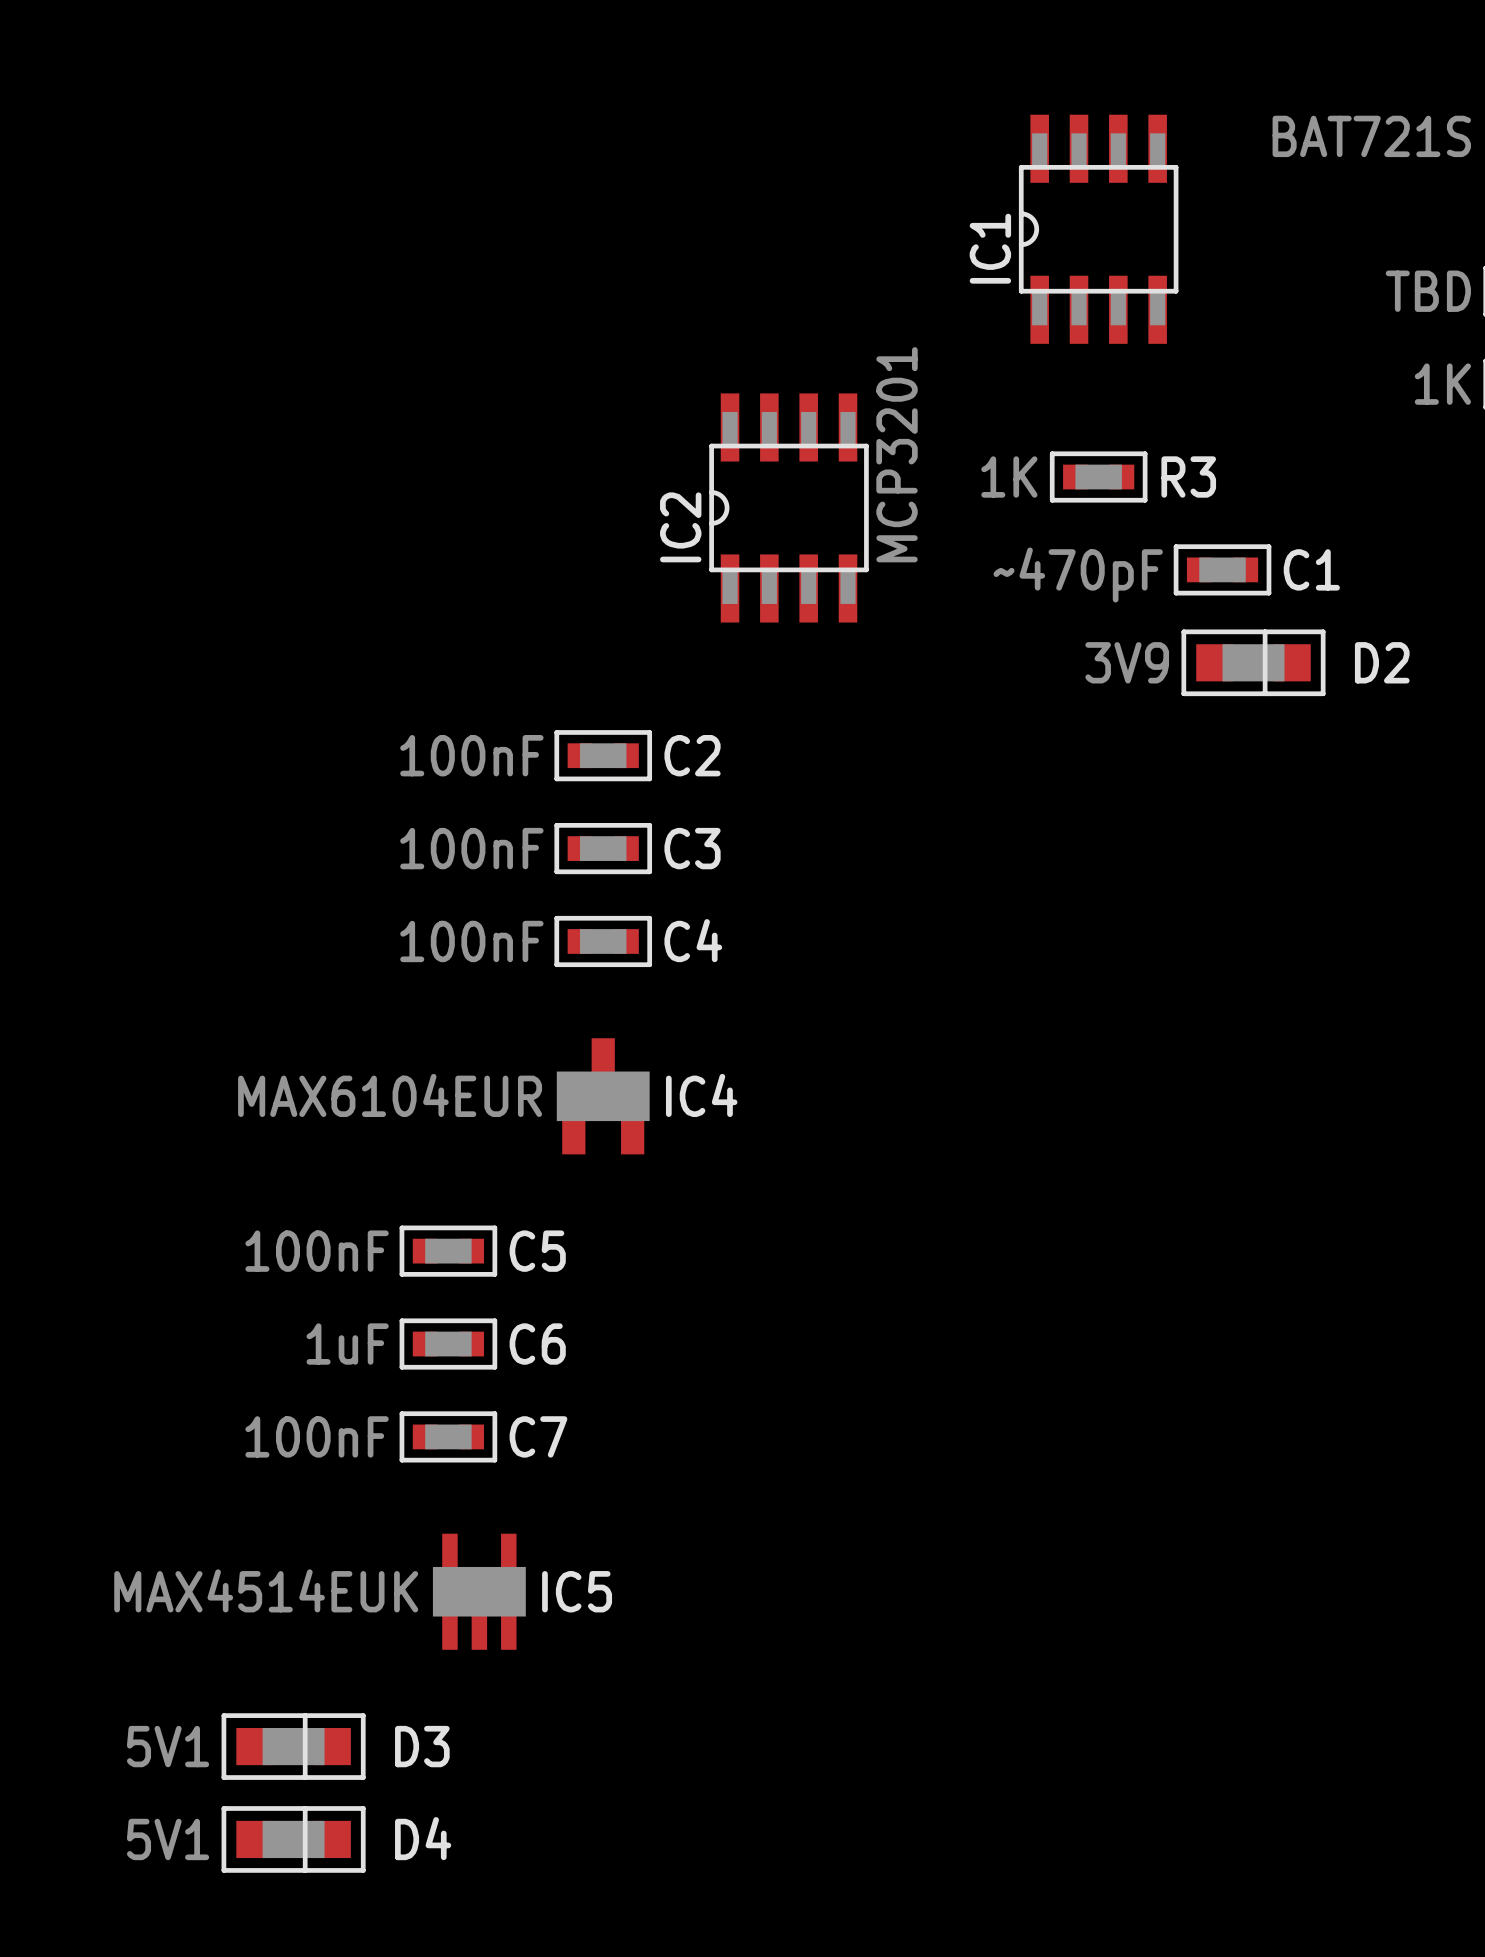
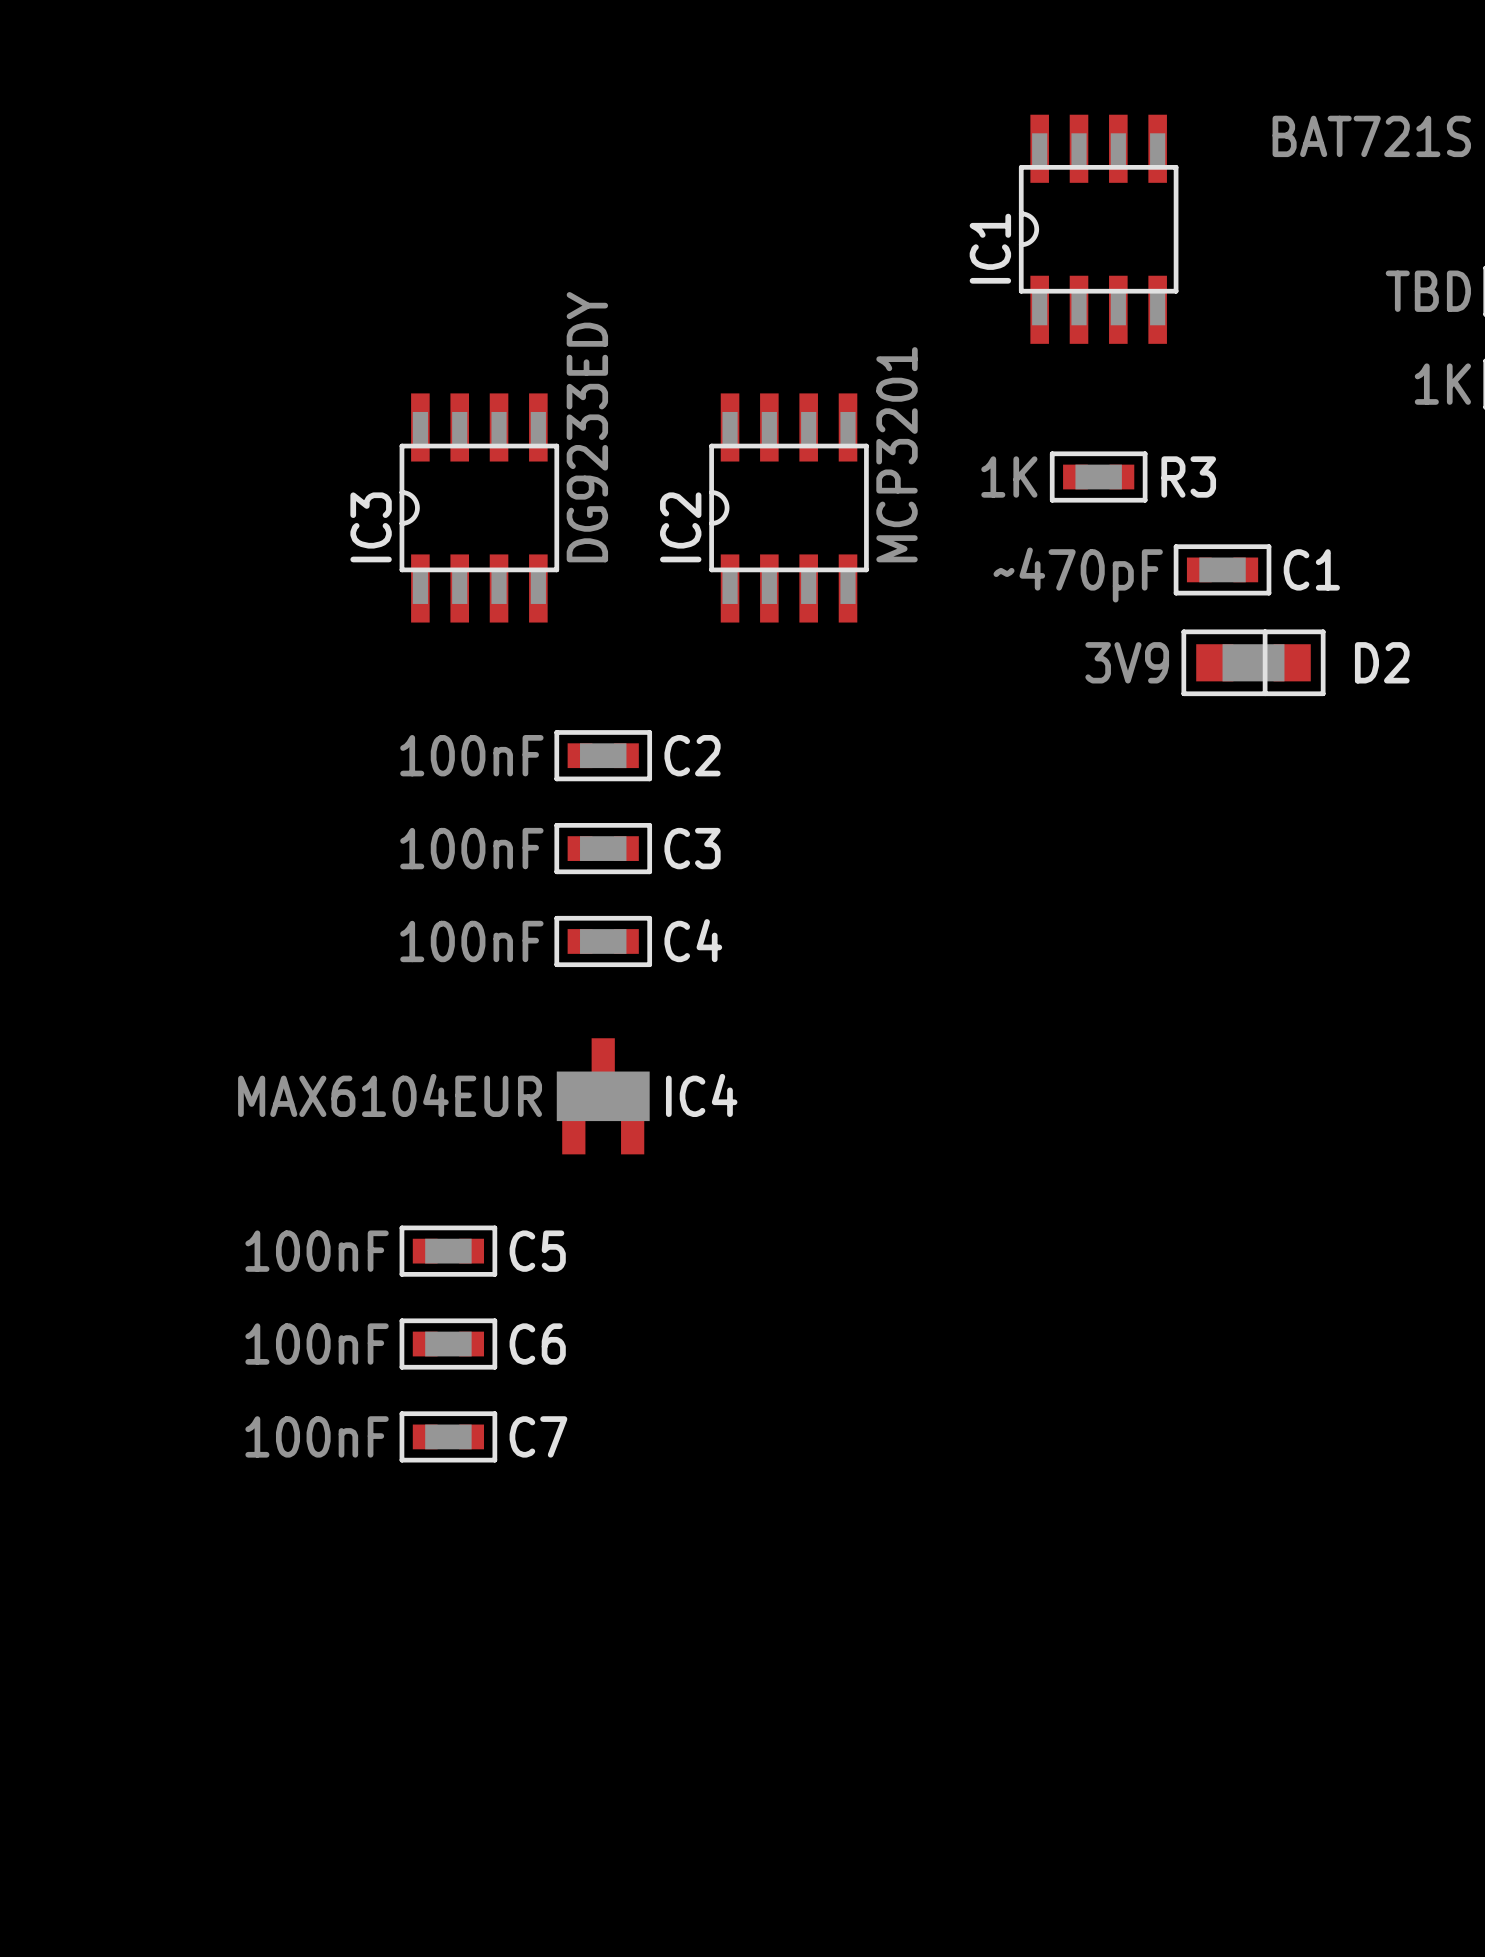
IC3: none -> DG9233EDY (479, 507)
C6 value: 1uF (347, 1344) -> 100nF (317, 1344)
IC5: MAX4514EUK (479, 1591) -> none
D3: 5V1 (293, 1746) -> none
D4: 5V1 (293, 1839) -> none

